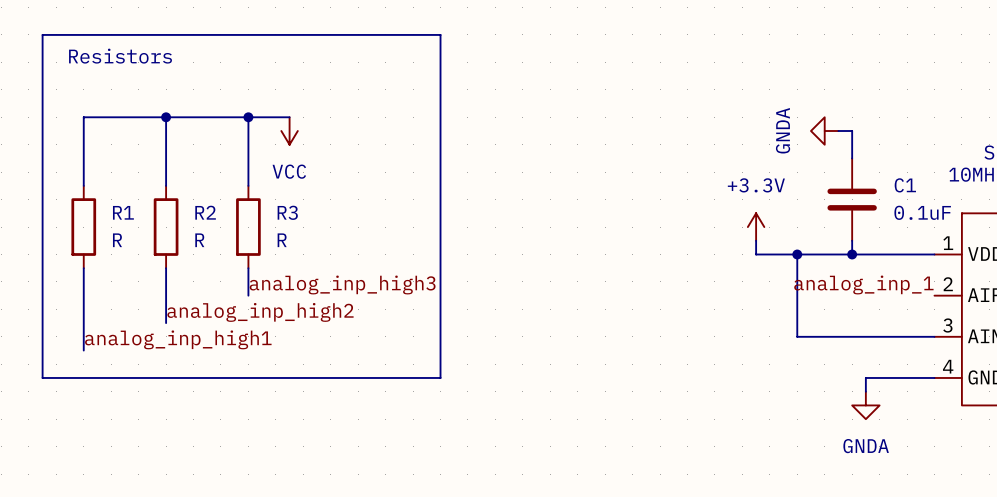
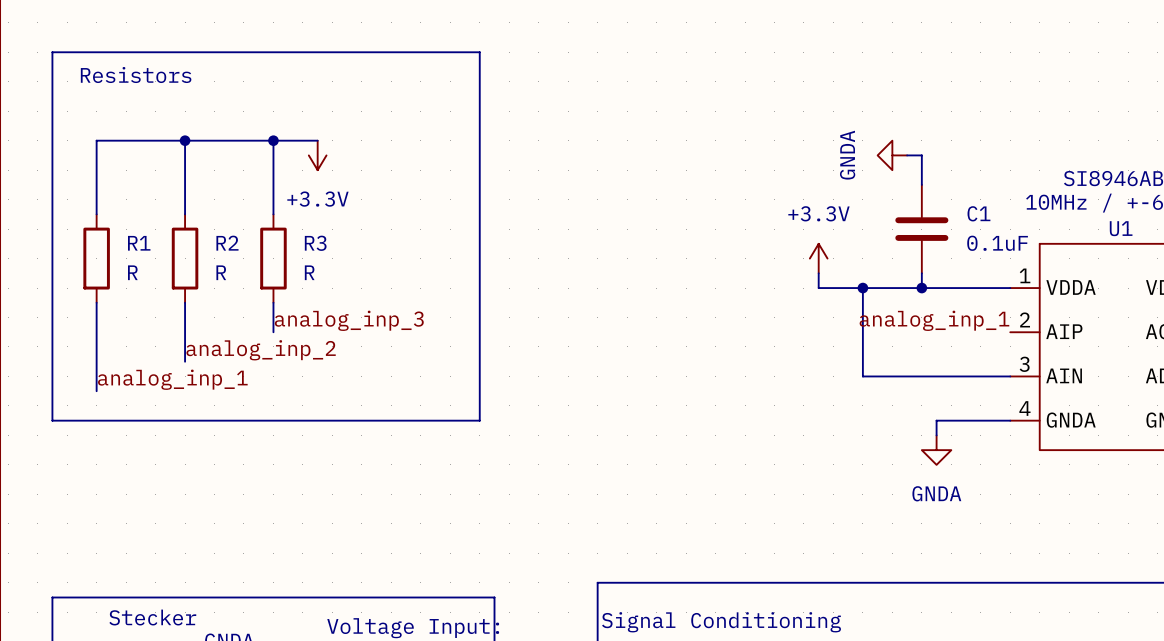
power symbol: VCC (289, 131) -> +3.3V (317, 155)
label: analog_inp_high3 (342, 285) -> analog_inp_3 (349, 320)
label: analog_inp_high2 (260, 312) -> analog_inp_2 (261, 350)
label: analog_inp_high1 (178, 339) -> analog_inp_1 (172, 379)

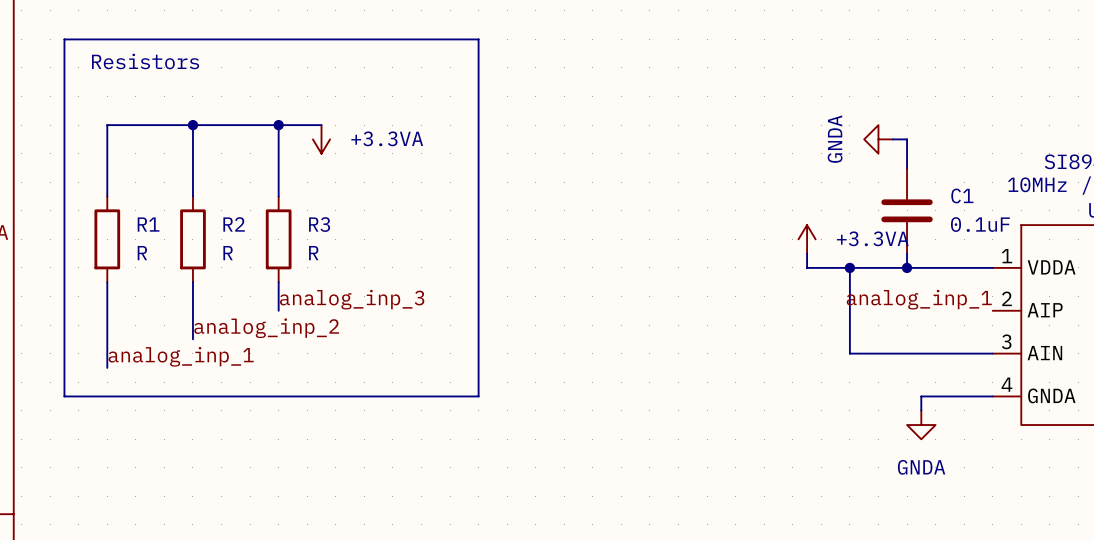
power symbol: +3.3V (317, 155) -> +3.3VA (321, 139)
power symbol: +3.3V (818, 258) -> +3.3VA (807, 239)

